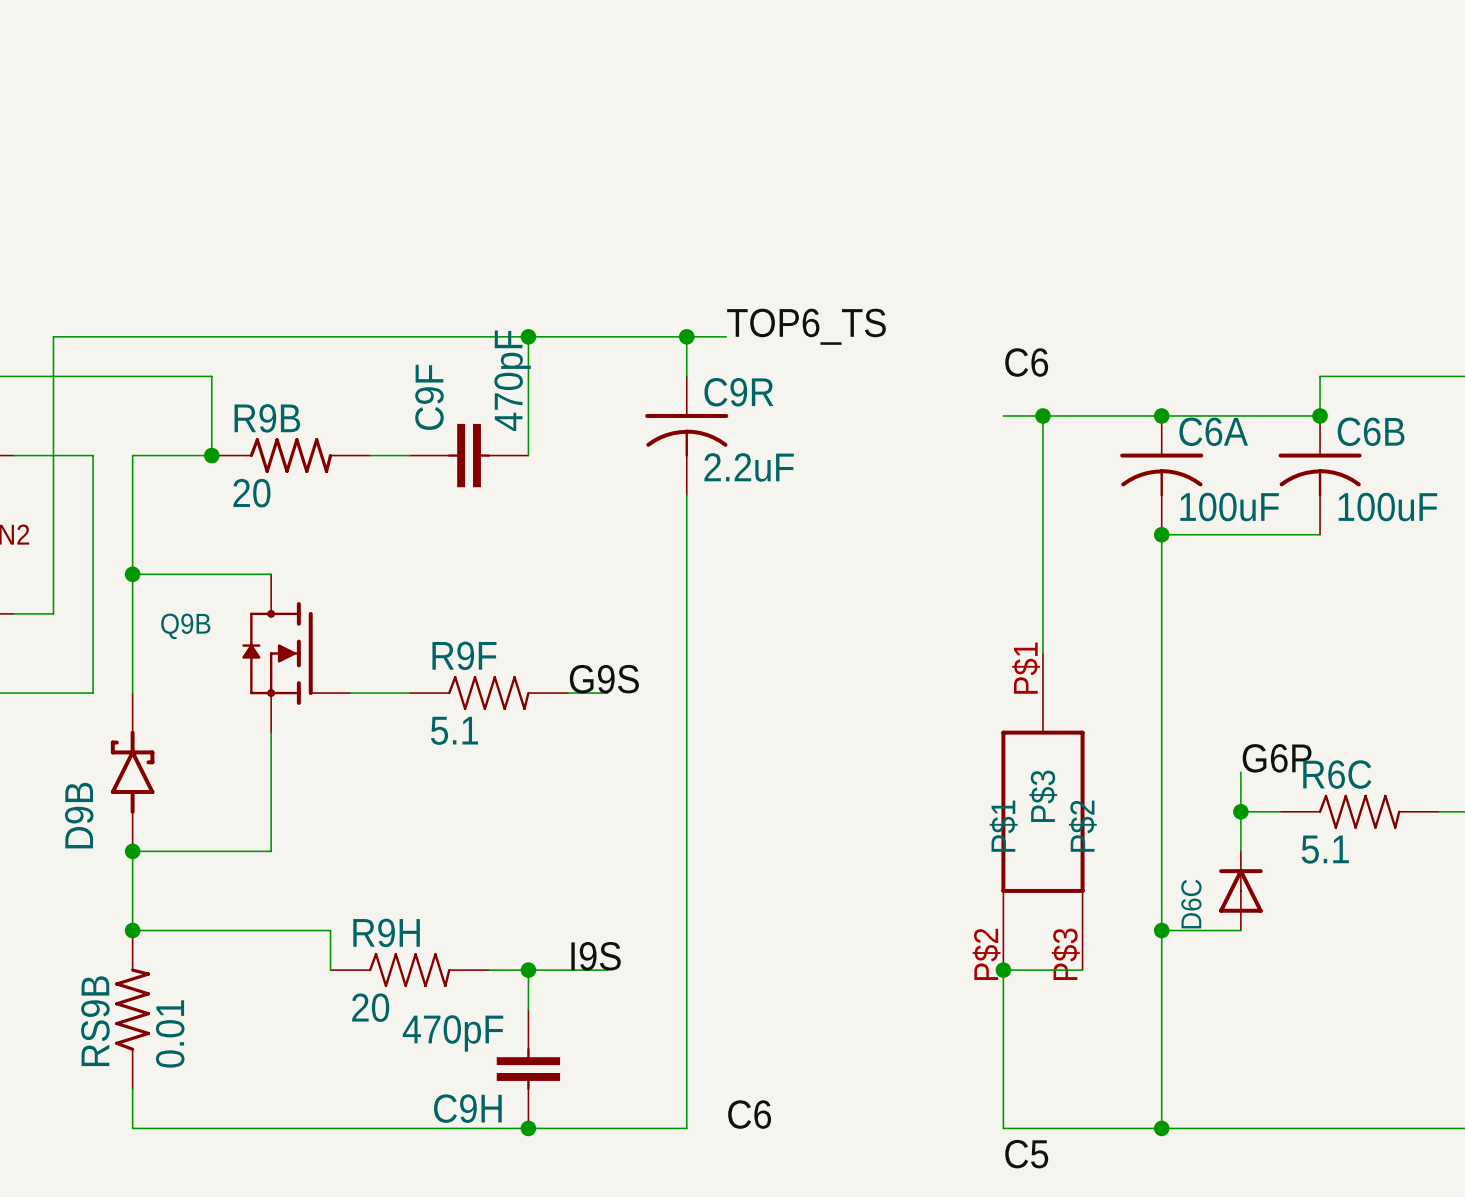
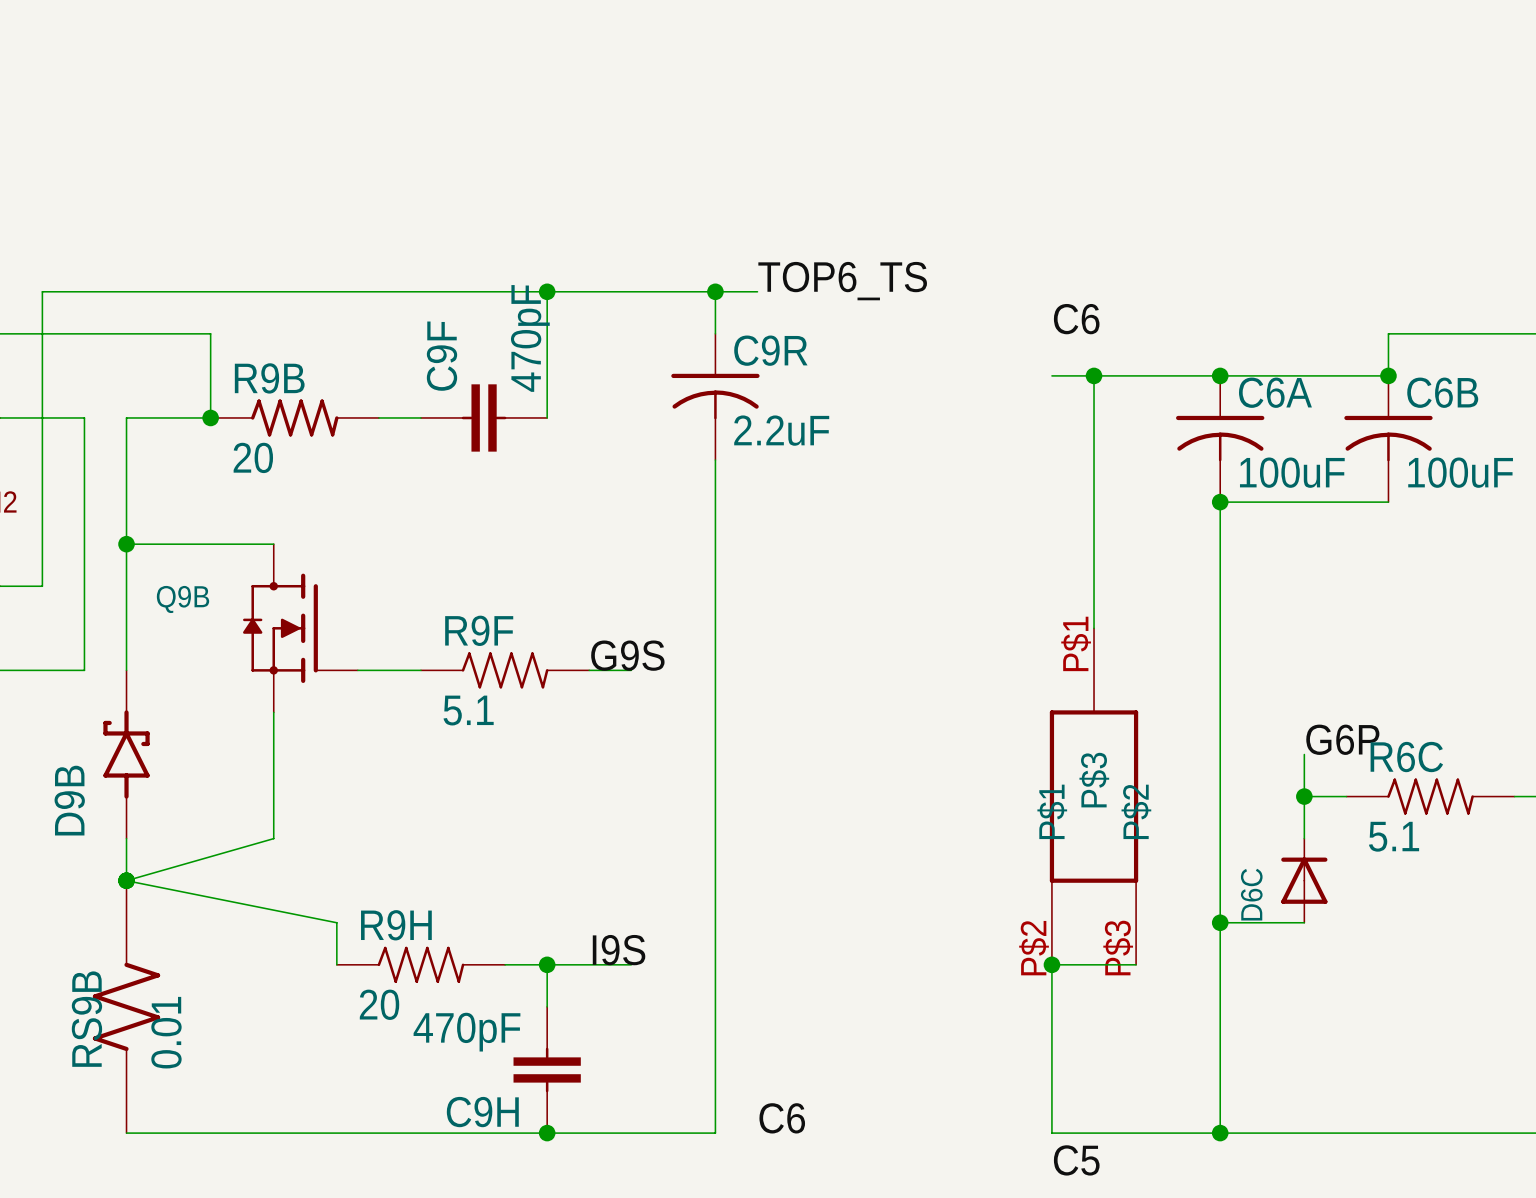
wire: (132, 851) (271, 851) -> none
junction: (132, 851) -> none
wire: (132, 890) (132, 930) (330, 930) -> (273, 838) (126, 880) (336, 922)
junction: none -> (126, 880)
RS9B symbol: [115, 930, 151, 1089] -> [92, 880, 161, 1134]
junction: (132, 930) -> none

